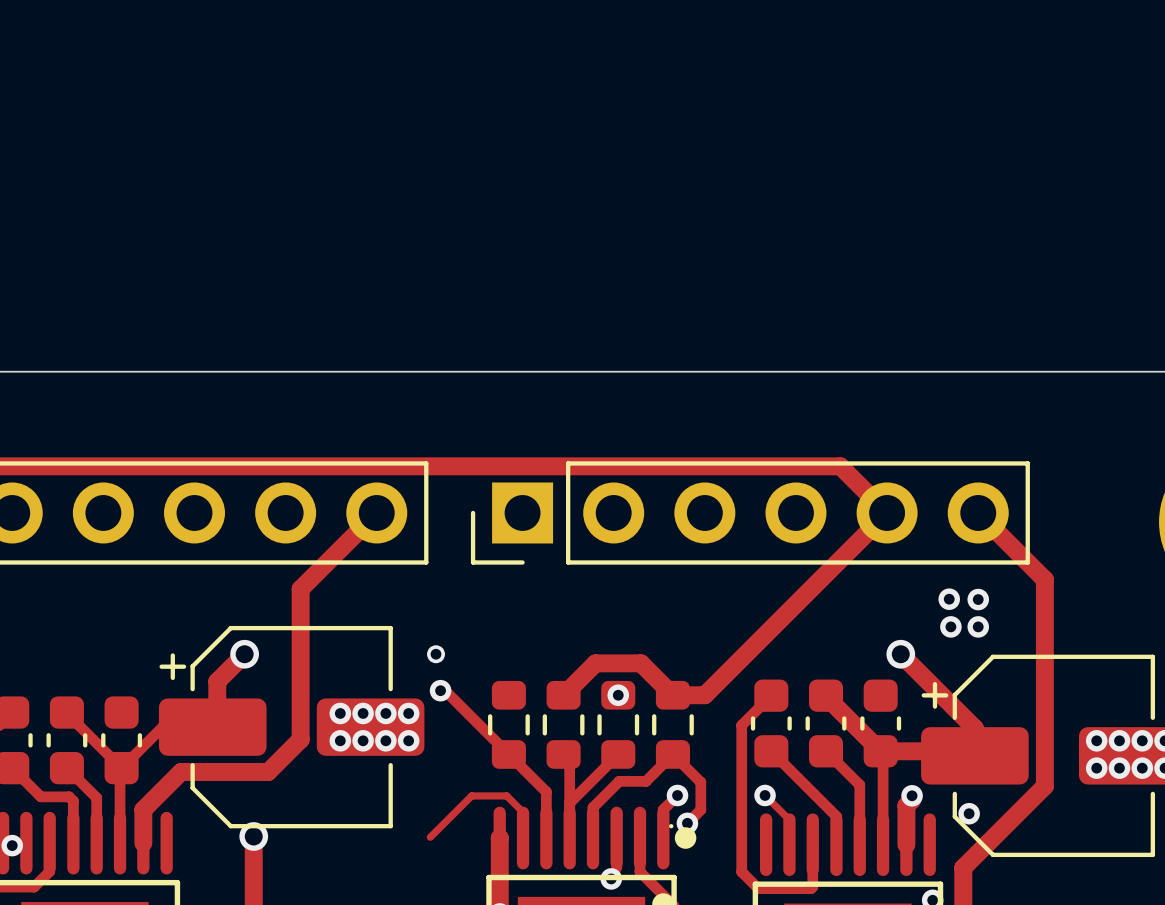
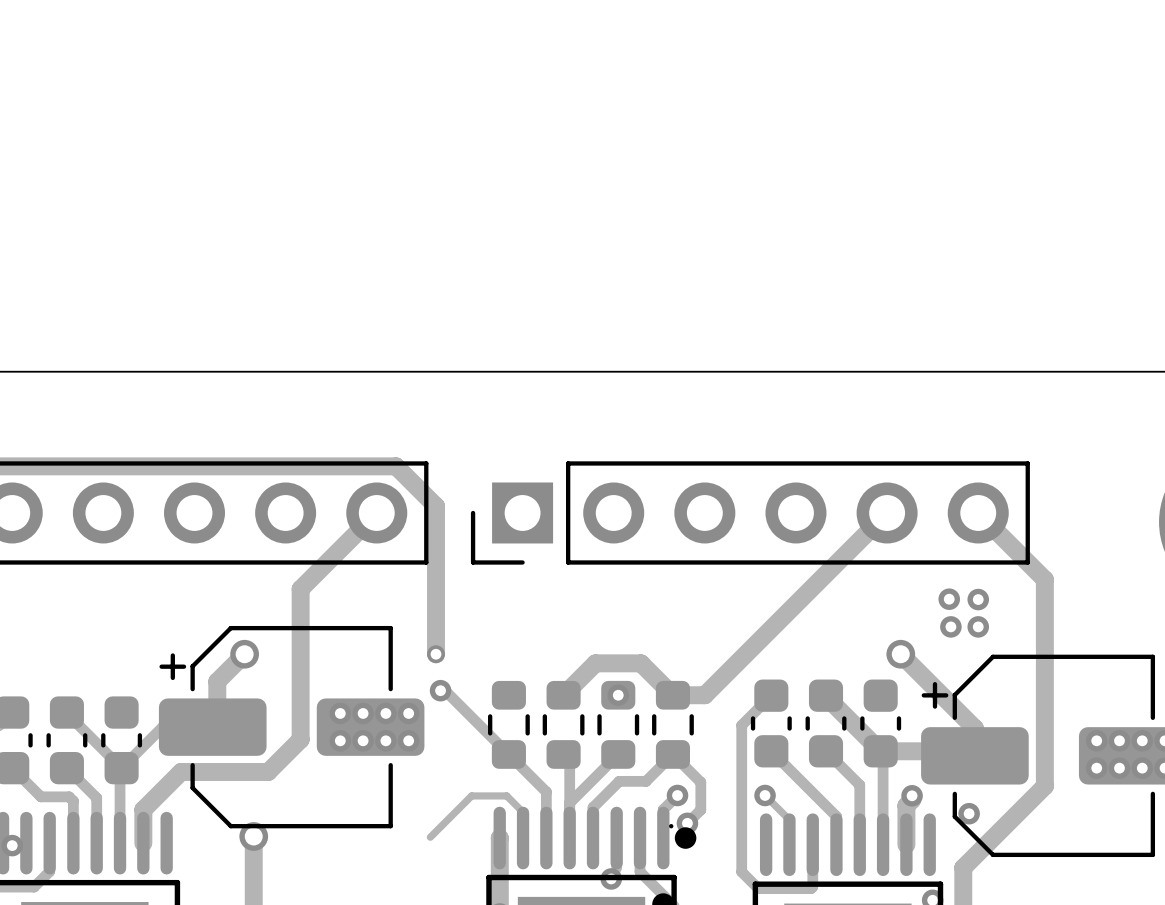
track: (396, 466) (840, 466) (887, 512) -> (396, 466) (436, 506) (436, 654)

